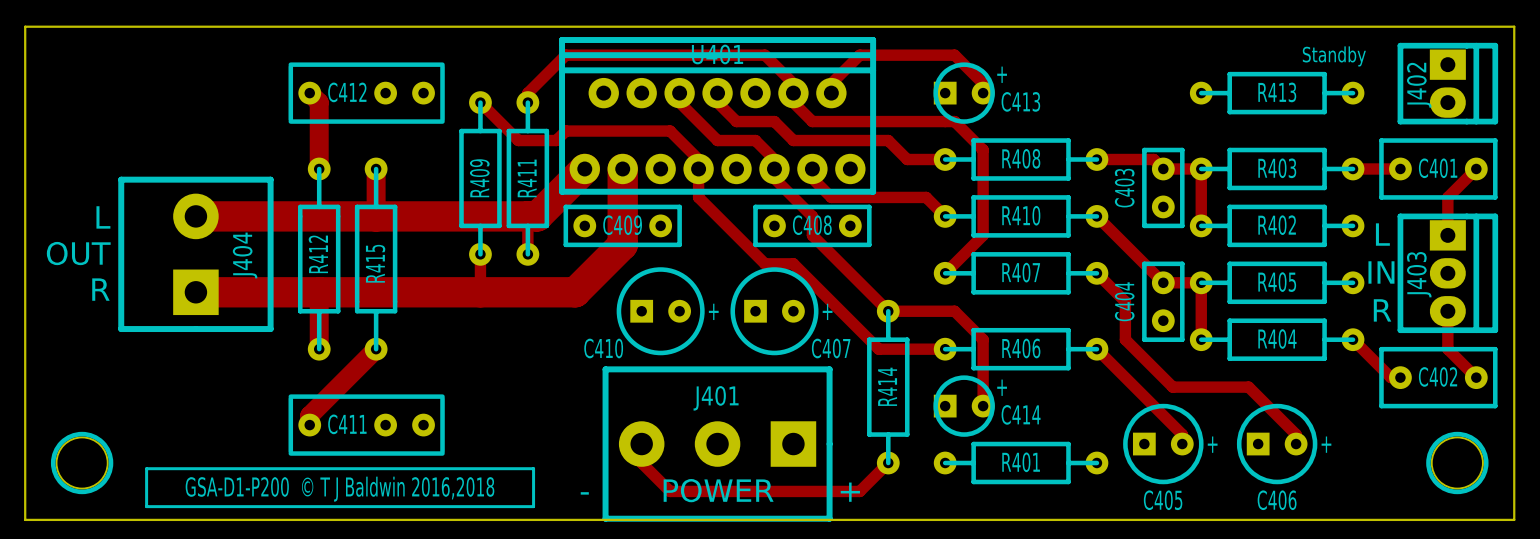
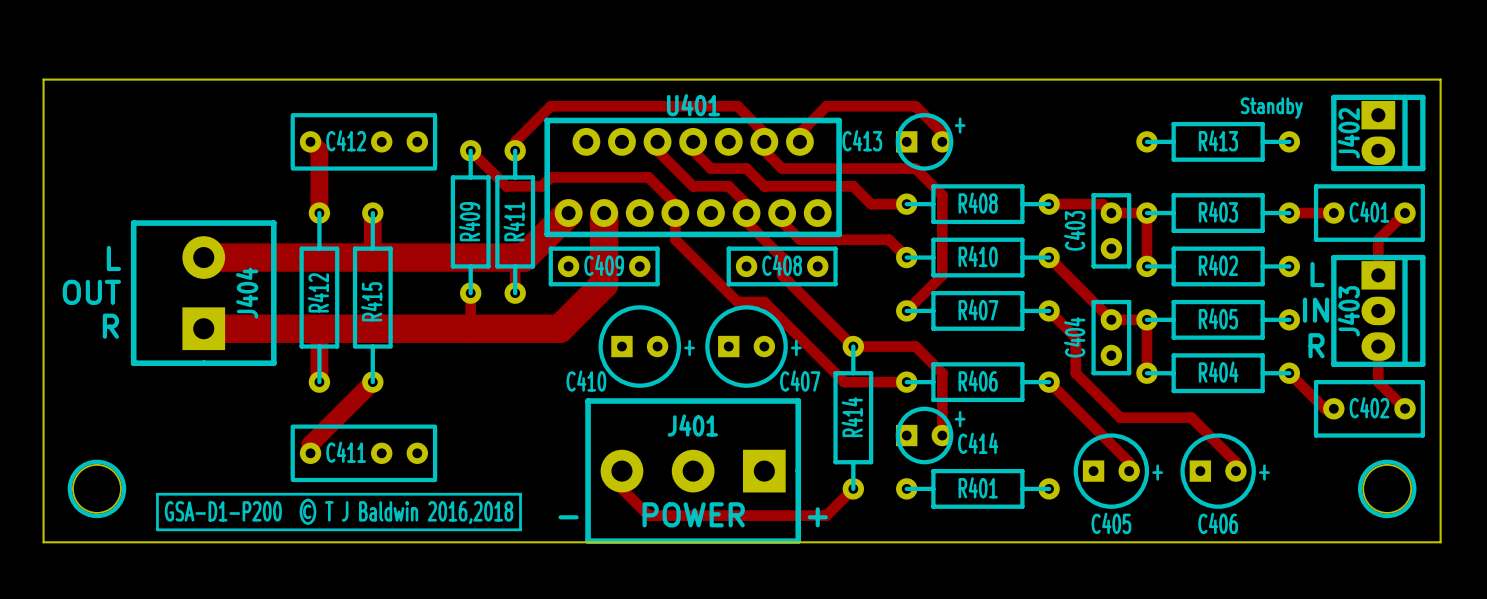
U401 footprint: [559, 37, 877, 195] -> [544, 117, 842, 238]
C413 name position: C413 (1020, 101) -> C413 (862, 140)

